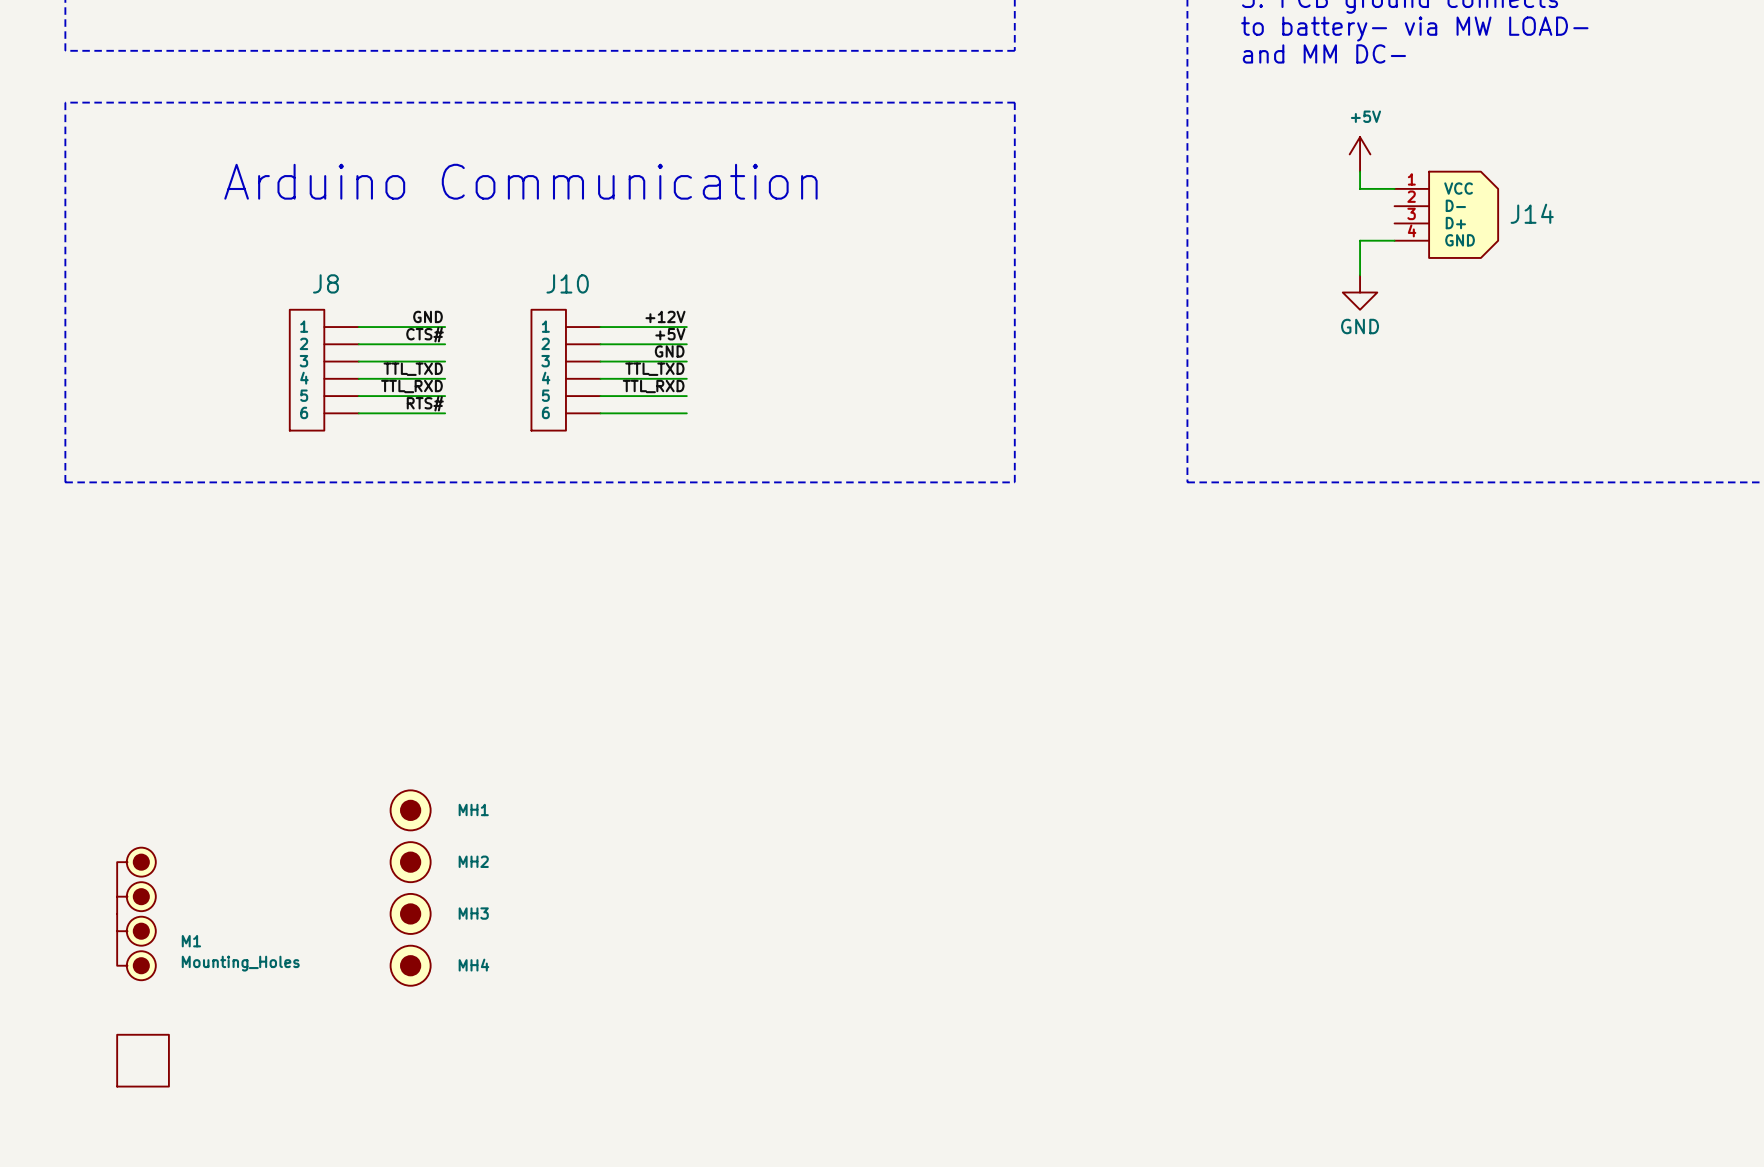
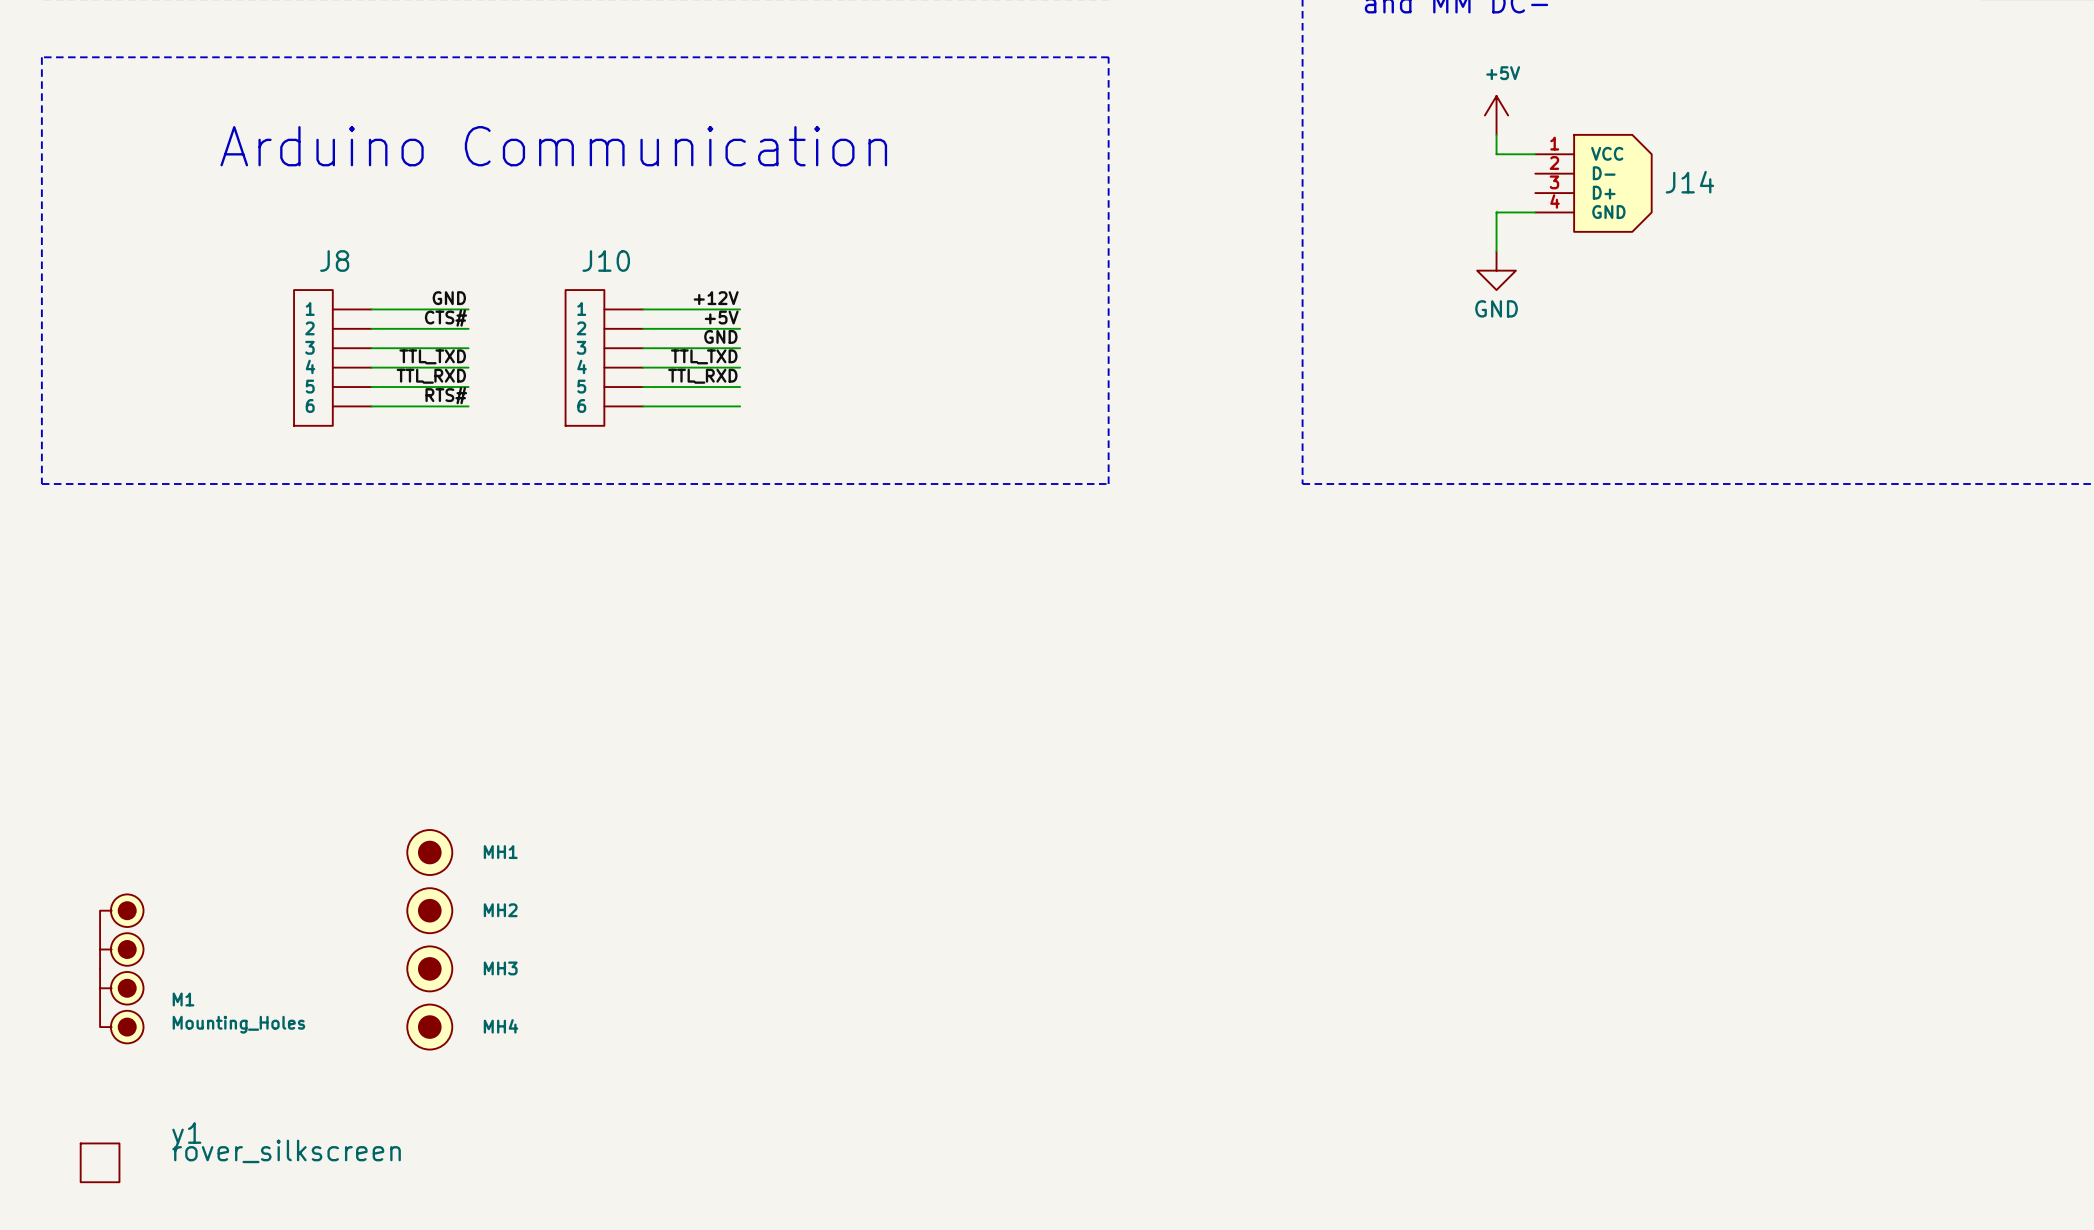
part: (143, 1060) -> none
y1: none -> rover_silkscreen (100, 1162)

